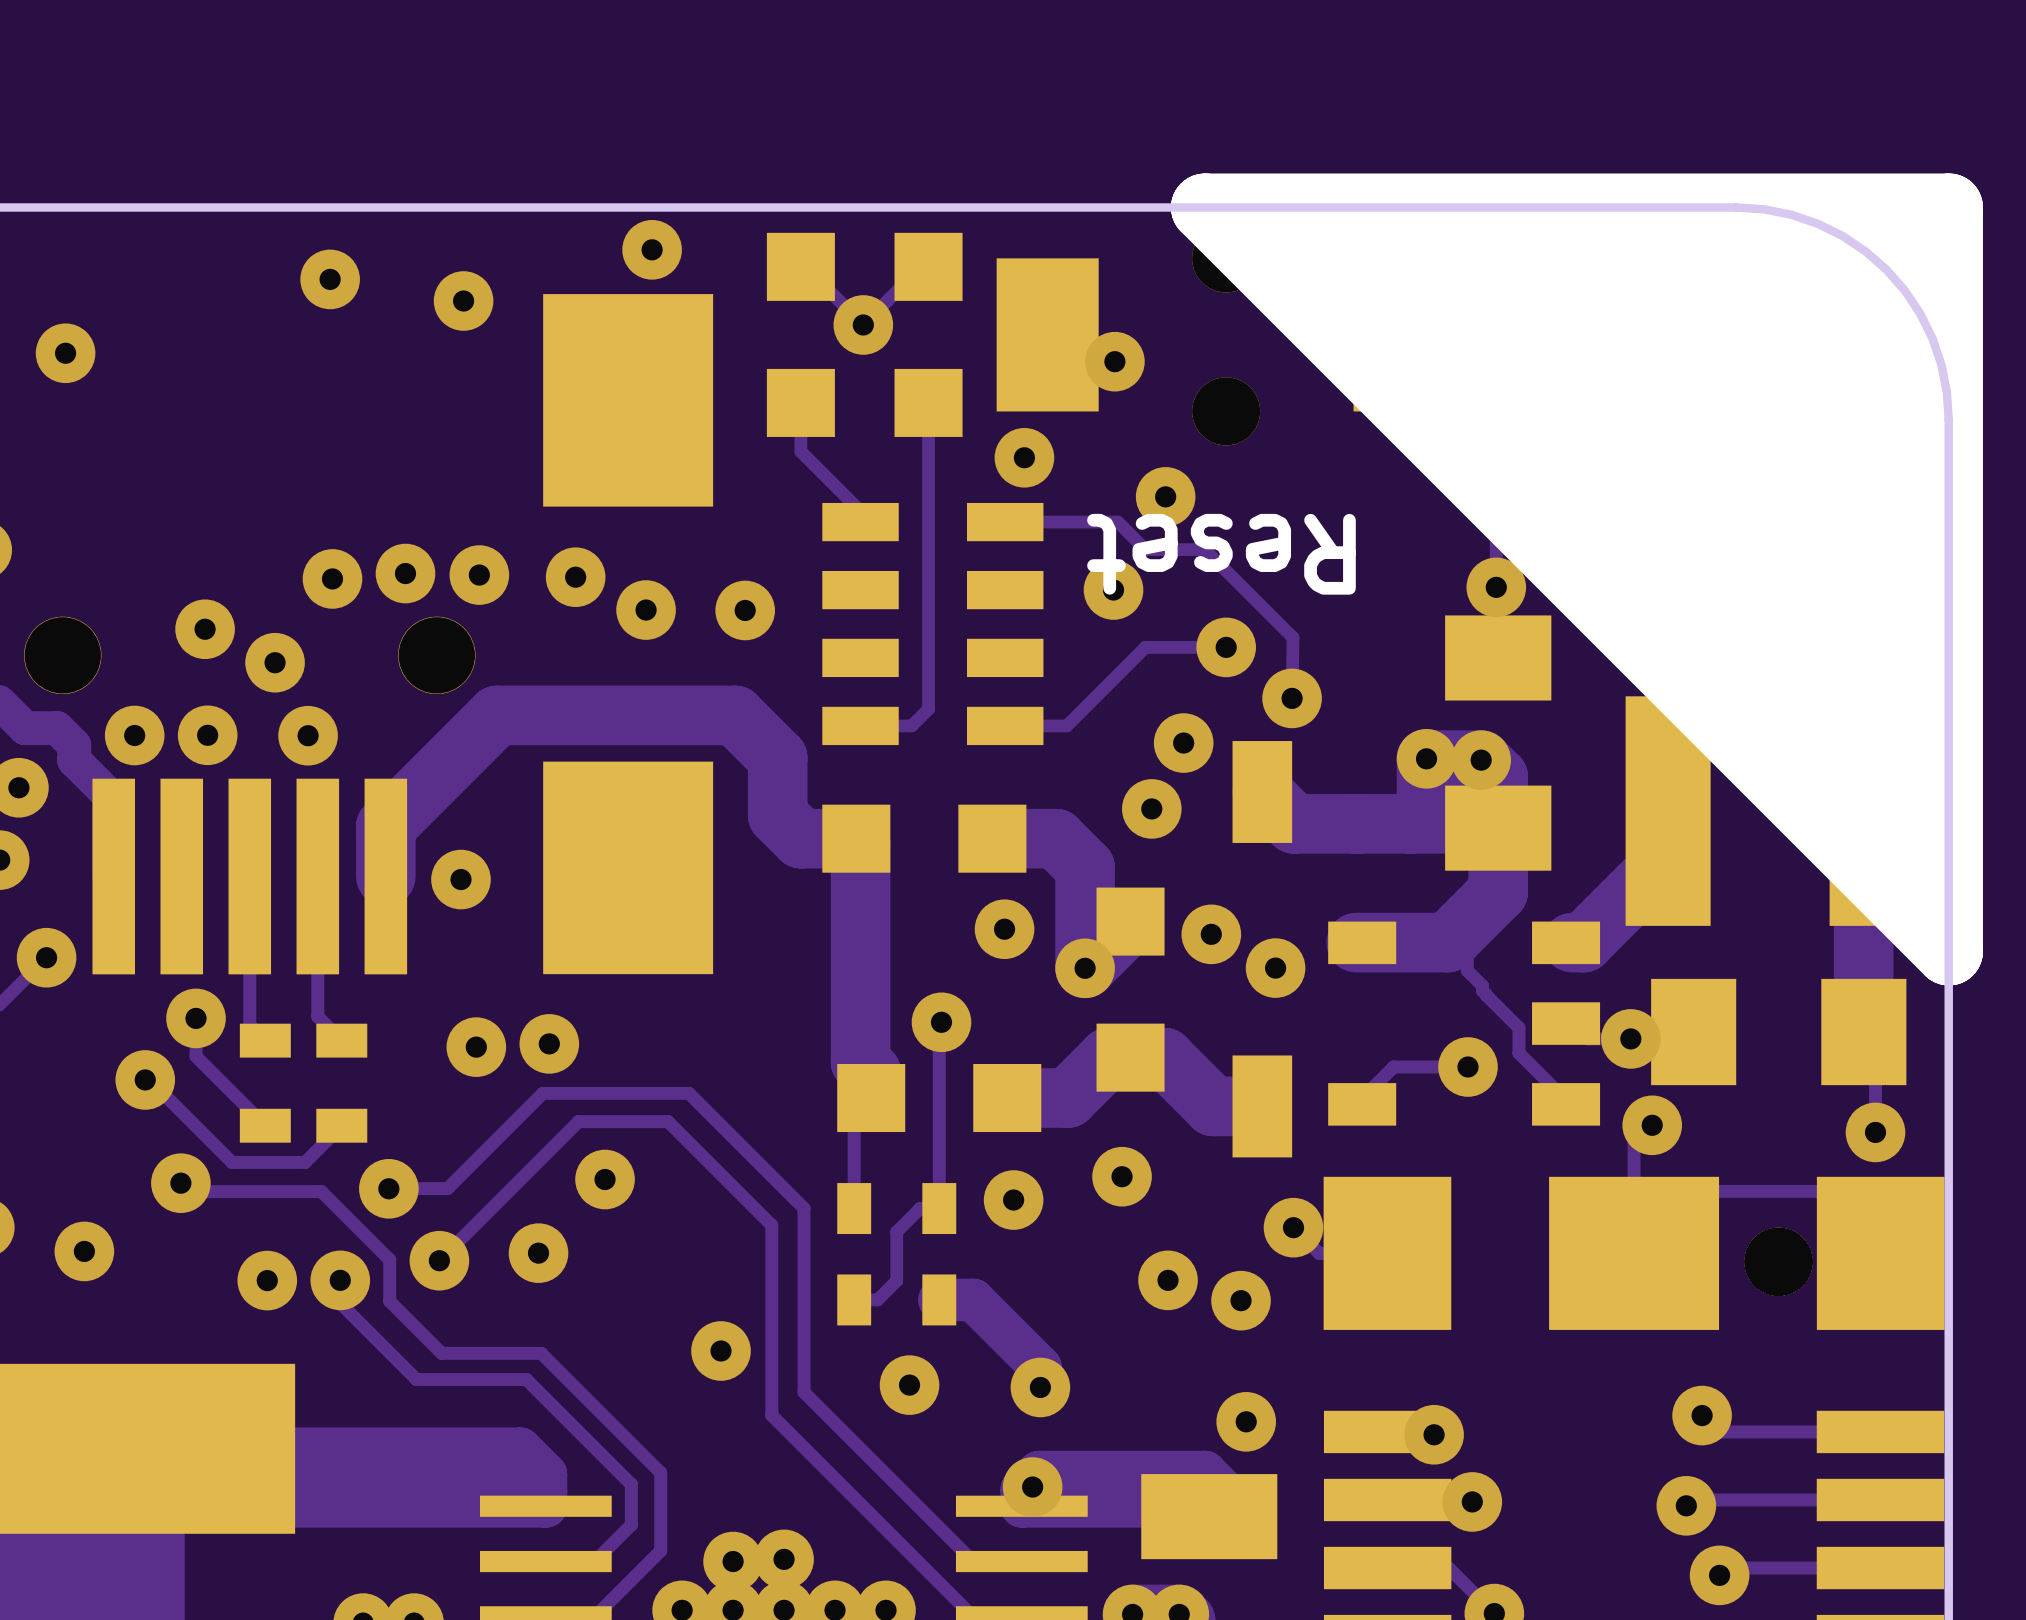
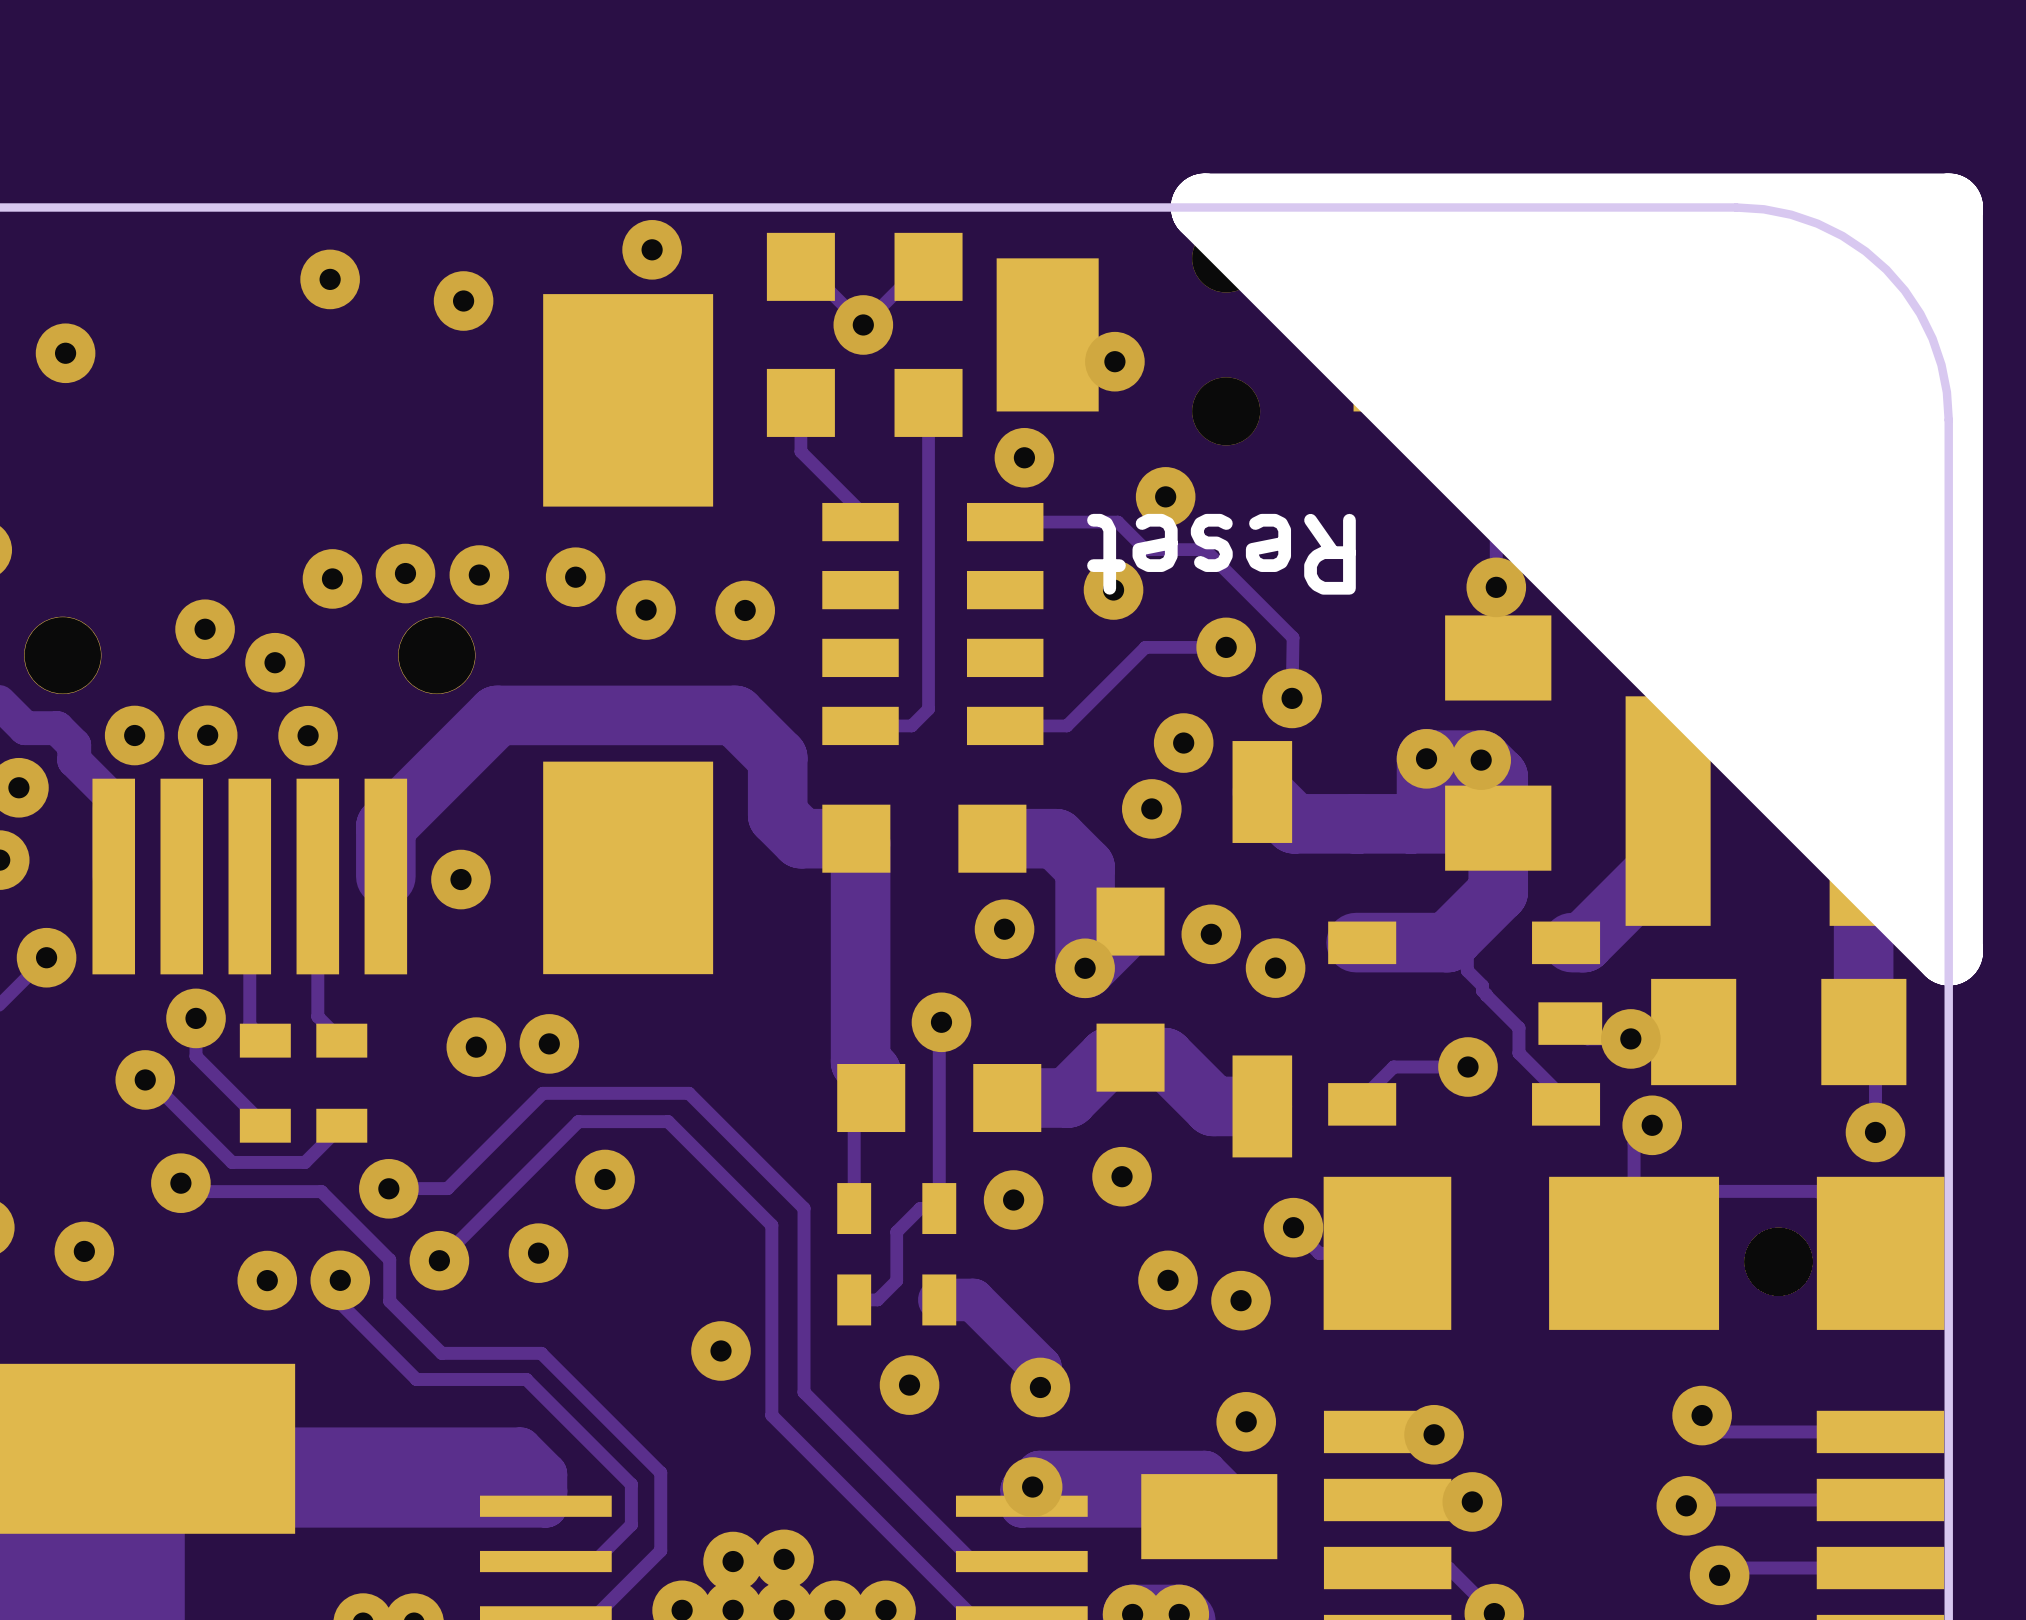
part footprint: [1328, 921, 1601, 1126] -> [1328, 921, 1603, 1126]

